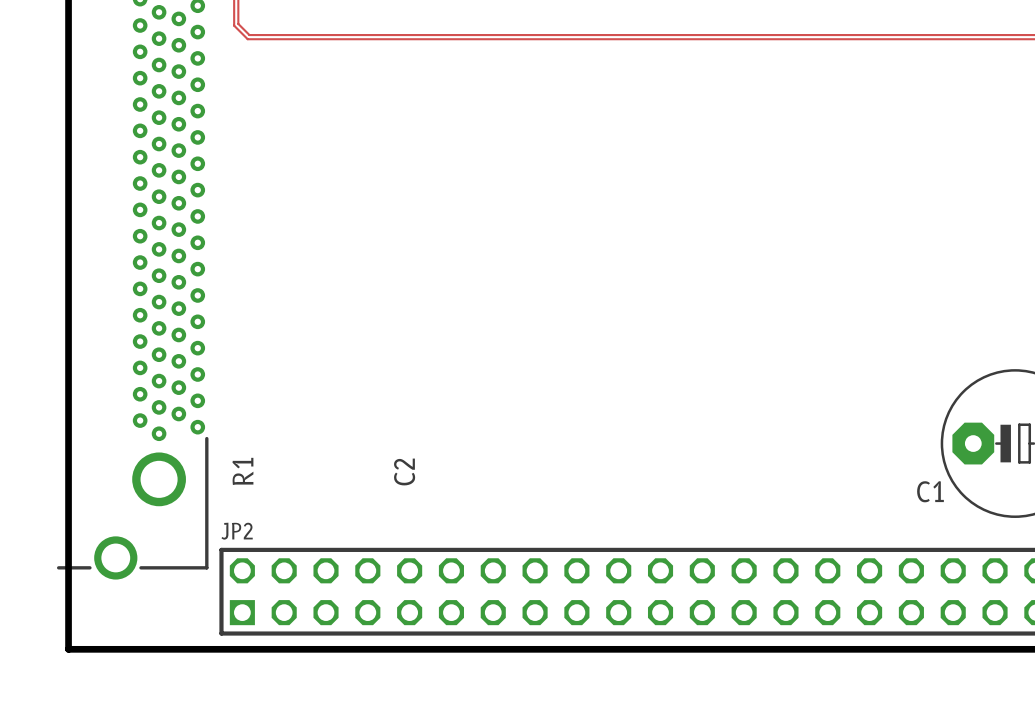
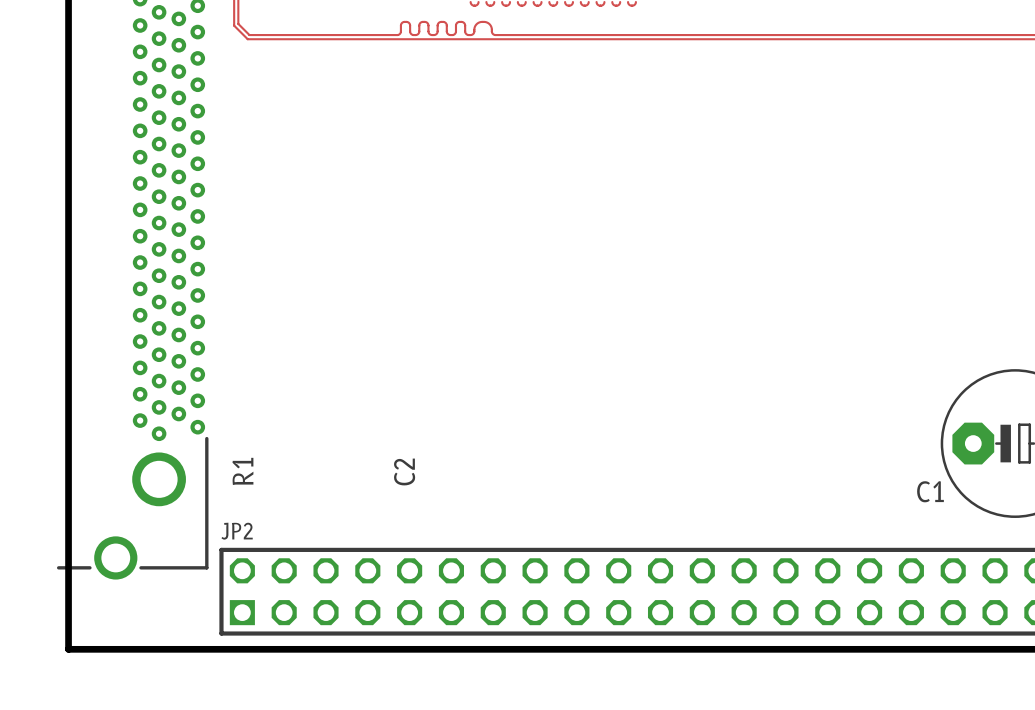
track: none -> (470, 2) (474, 5) (478, 2)
track: none -> (486, 2) (490, 5) (494, 2)
track: none -> (502, 2) (505, 5) (510, 2)
track: none -> (517, 2) (521, 5) (525, 2)
track: none -> (533, 2) (537, 5) (541, 2)
track: none -> (549, 2) (553, 5) (557, 2)
track: none -> (565, 2) (568, 5) (572, 2)
track: none -> (580, 2) (584, 5) (588, 2)
track: none -> (596, 2) (600, 5) (604, 2)
track: none -> (612, 2) (615, 5) (620, 2)
track: none -> (628, 2) (631, 5) (635, 2)
track: (397, 35) (413, 35) -> (397, 35) (400, 33) (401, 24) (404, 21) (409, 23) (410, 32) (413, 35)
track: (415, 35) (432, 35) -> (415, 35) (419, 32) (419, 23) (422, 21) (427, 23) (428, 32) (432, 35)
track: (433, 35) (450, 35) -> (433, 35) (437, 32) (438, 23) (441, 21) (446, 23) (447, 32) (450, 35)
track: (452, 35) (468, 35) -> (452, 35) (455, 32) (456, 23) (459, 21) (464, 23) (465, 32) (468, 35)
track: (470, 35) (495, 35) -> (470, 35) (473, 33) (475, 24) (482, 21) (489, 24) (492, 33) (495, 35)

